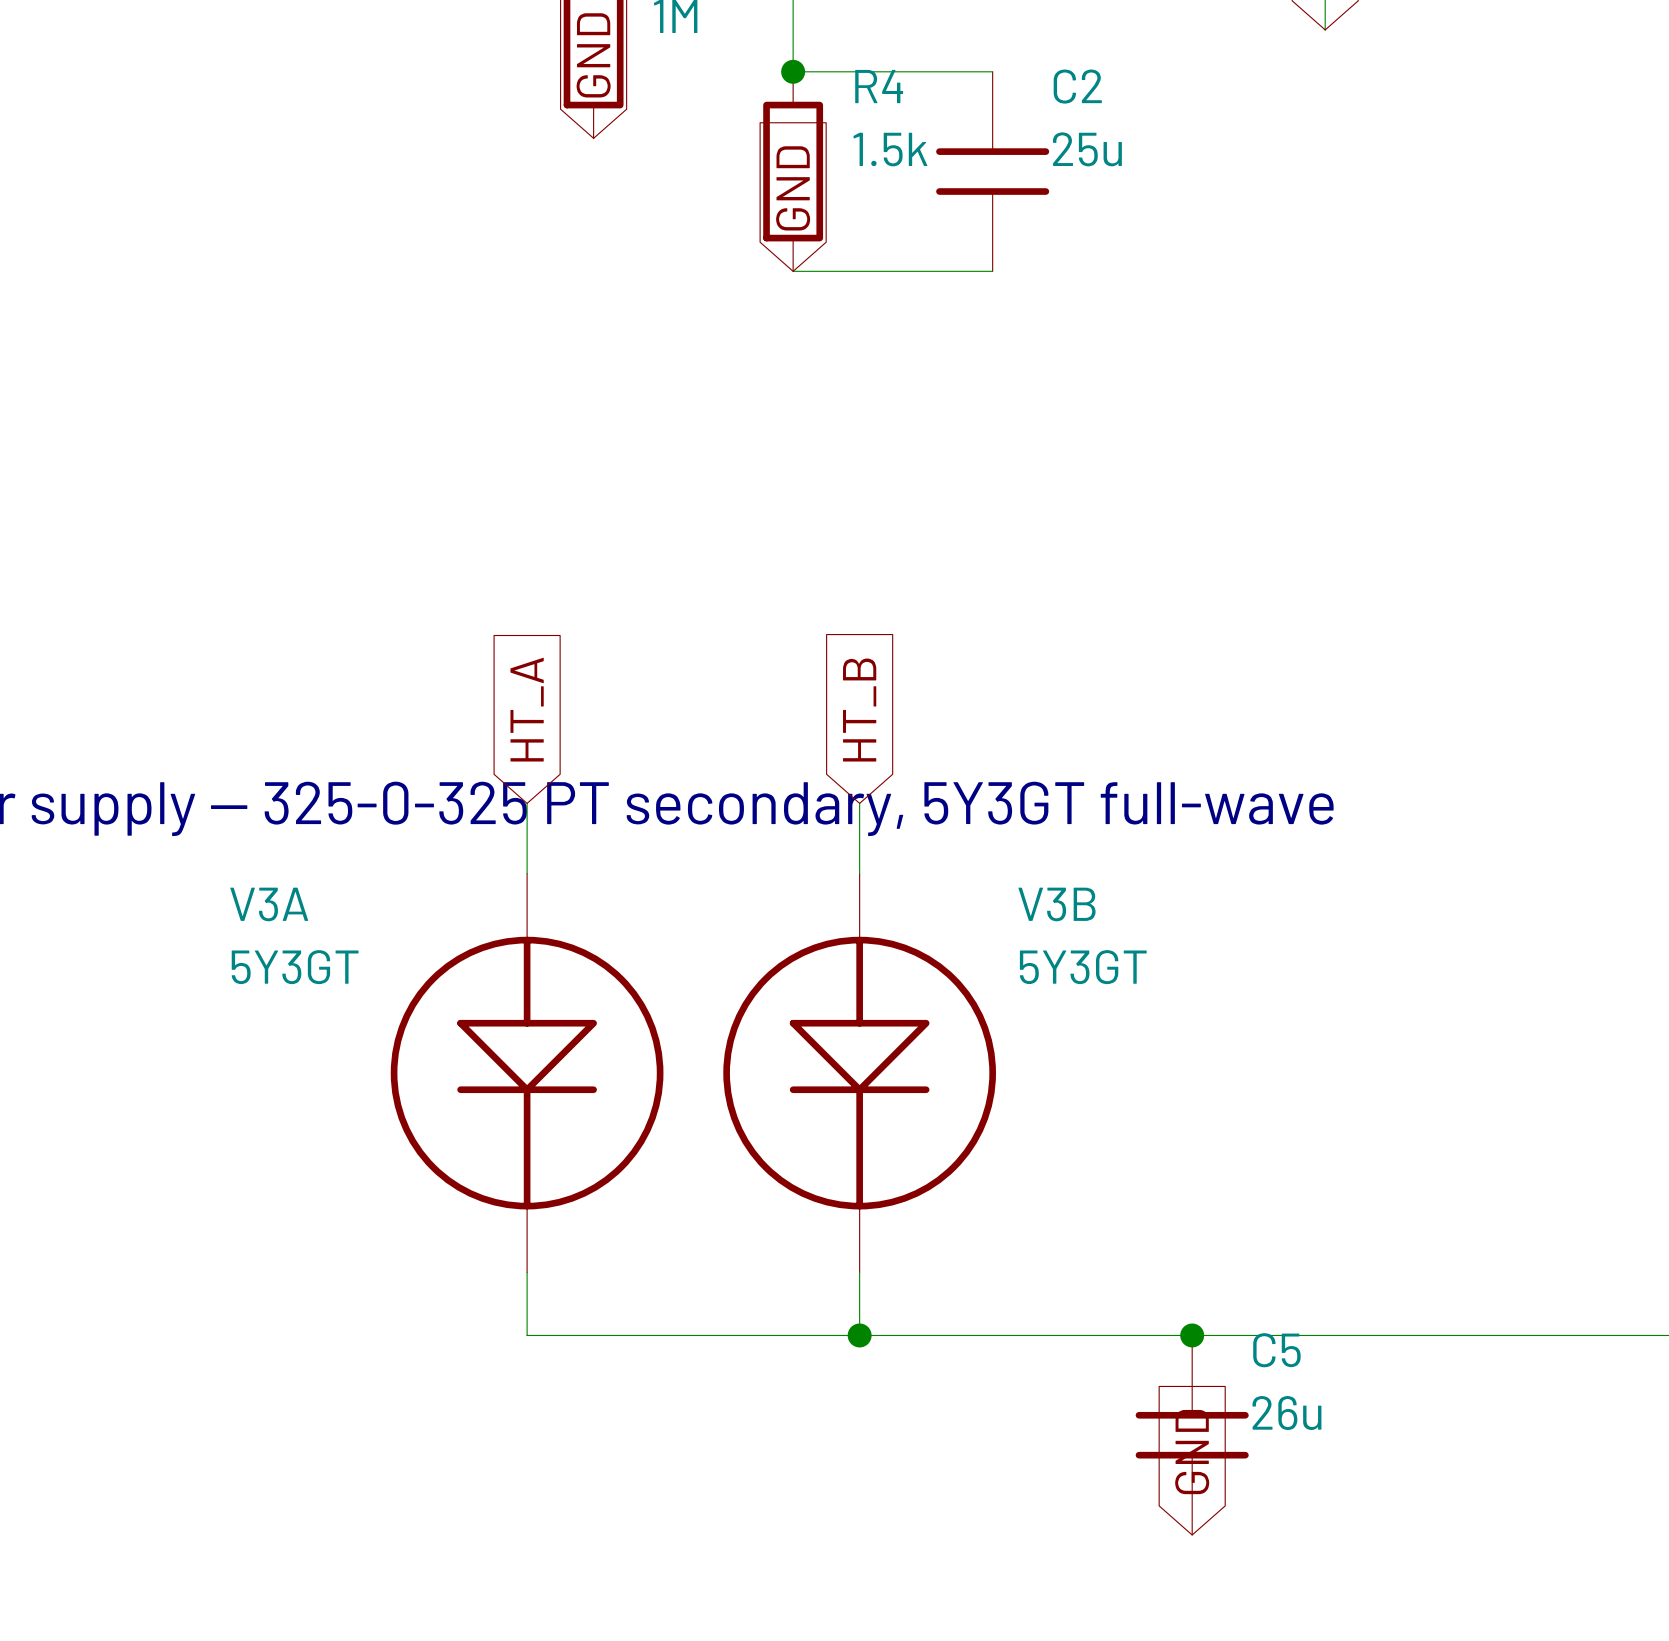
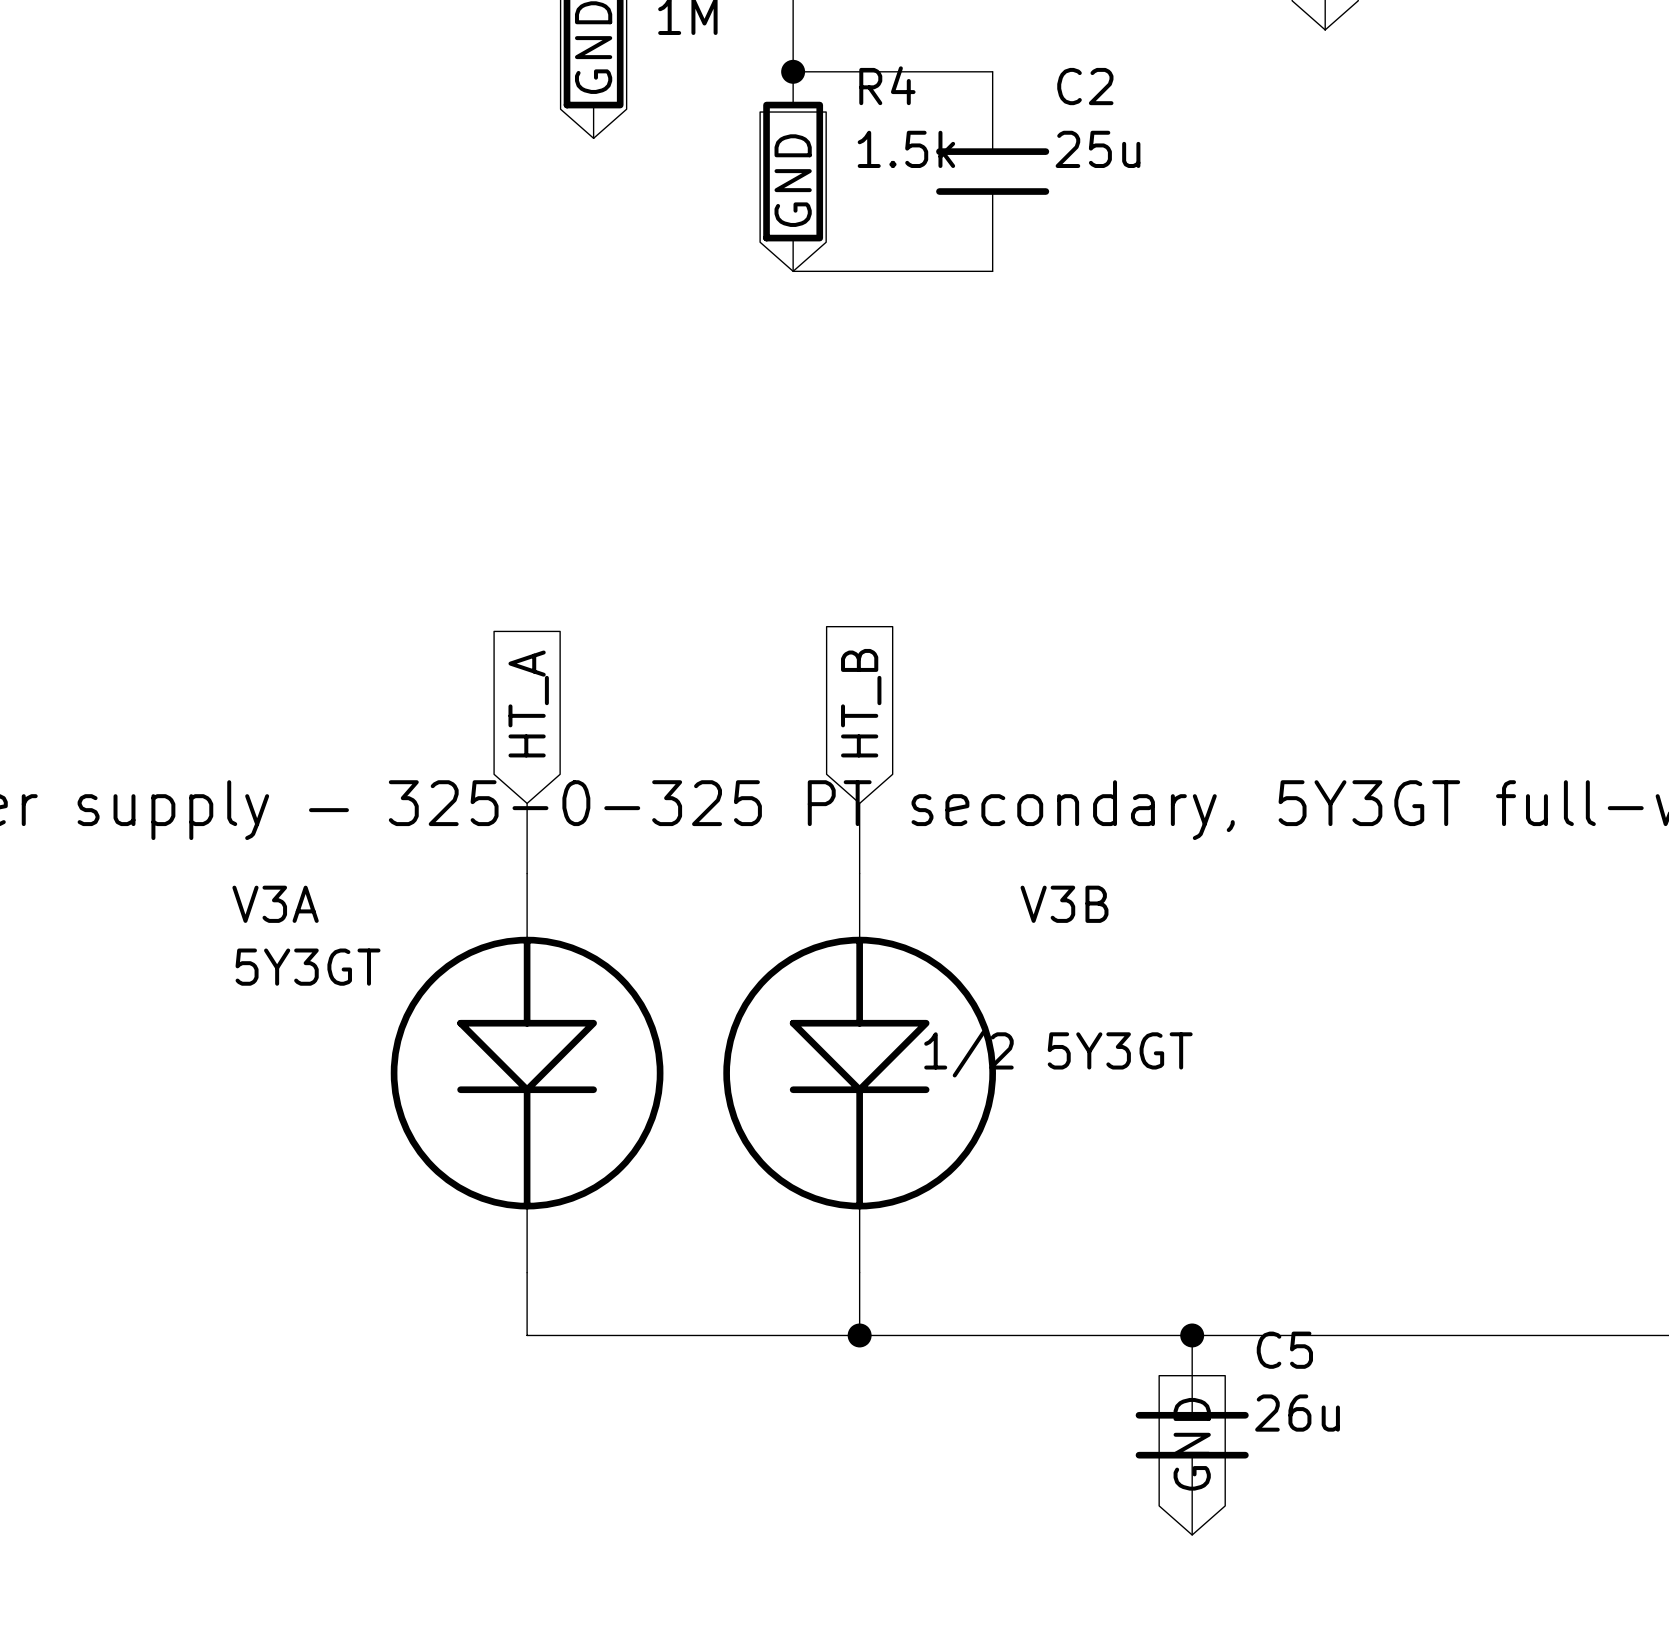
V3B value: 5Y3GT (1083, 967) -> 1/2 5Y3GT (1058, 1054)

